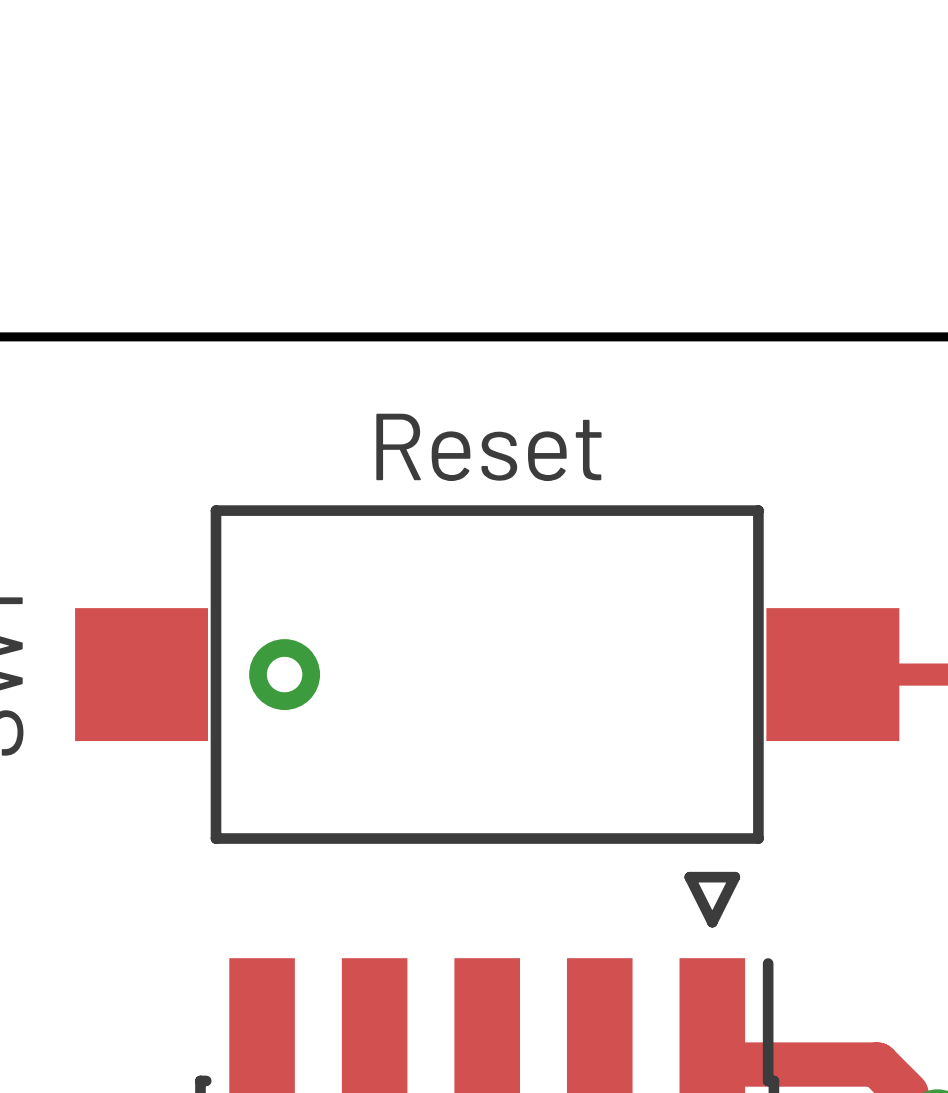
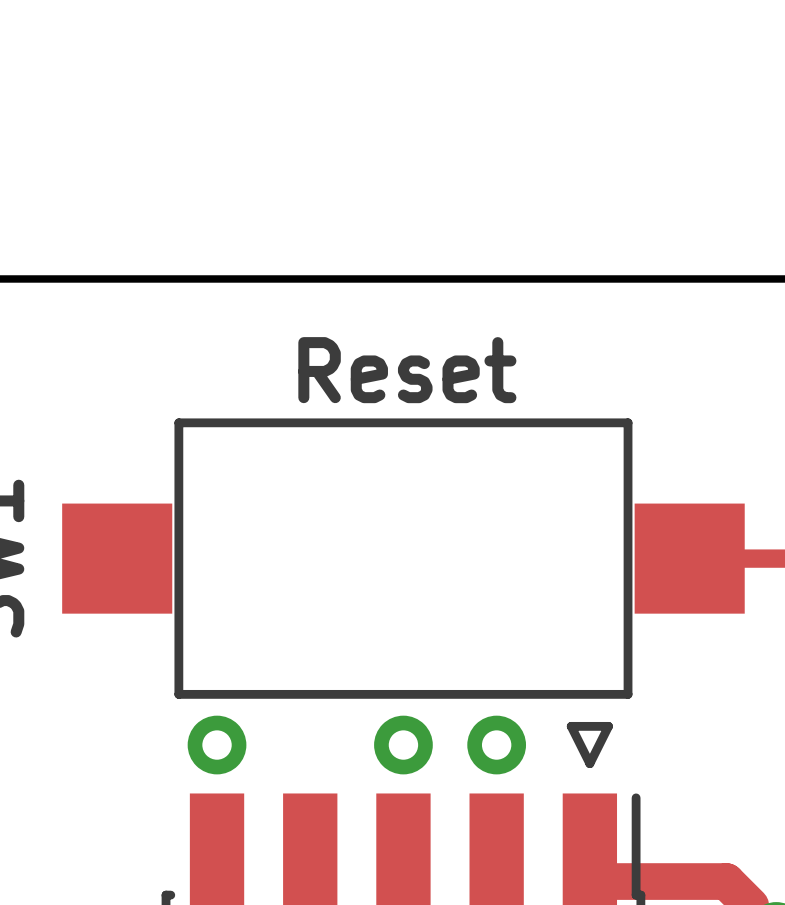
via: (284, 674) -> none
via: none -> (217, 745)
via: none -> (403, 745)
via: none -> (496, 745)

